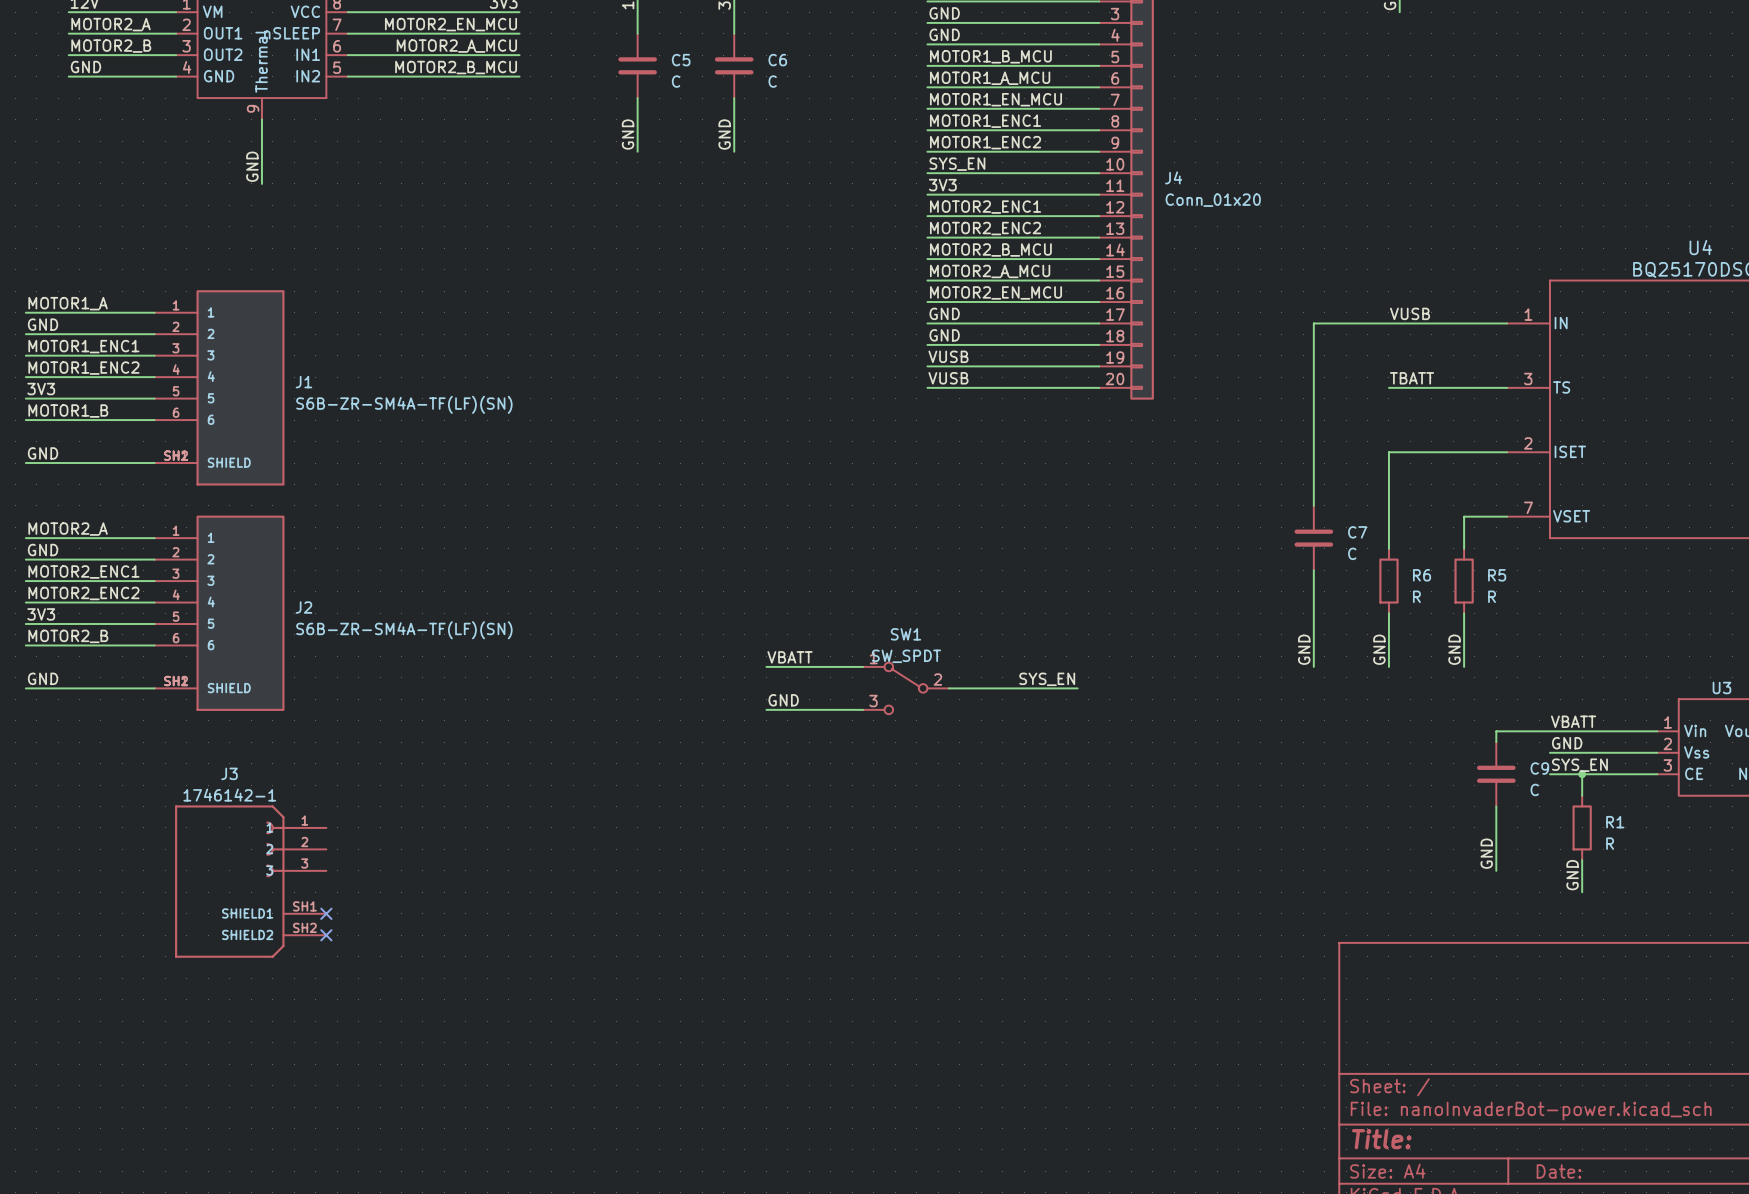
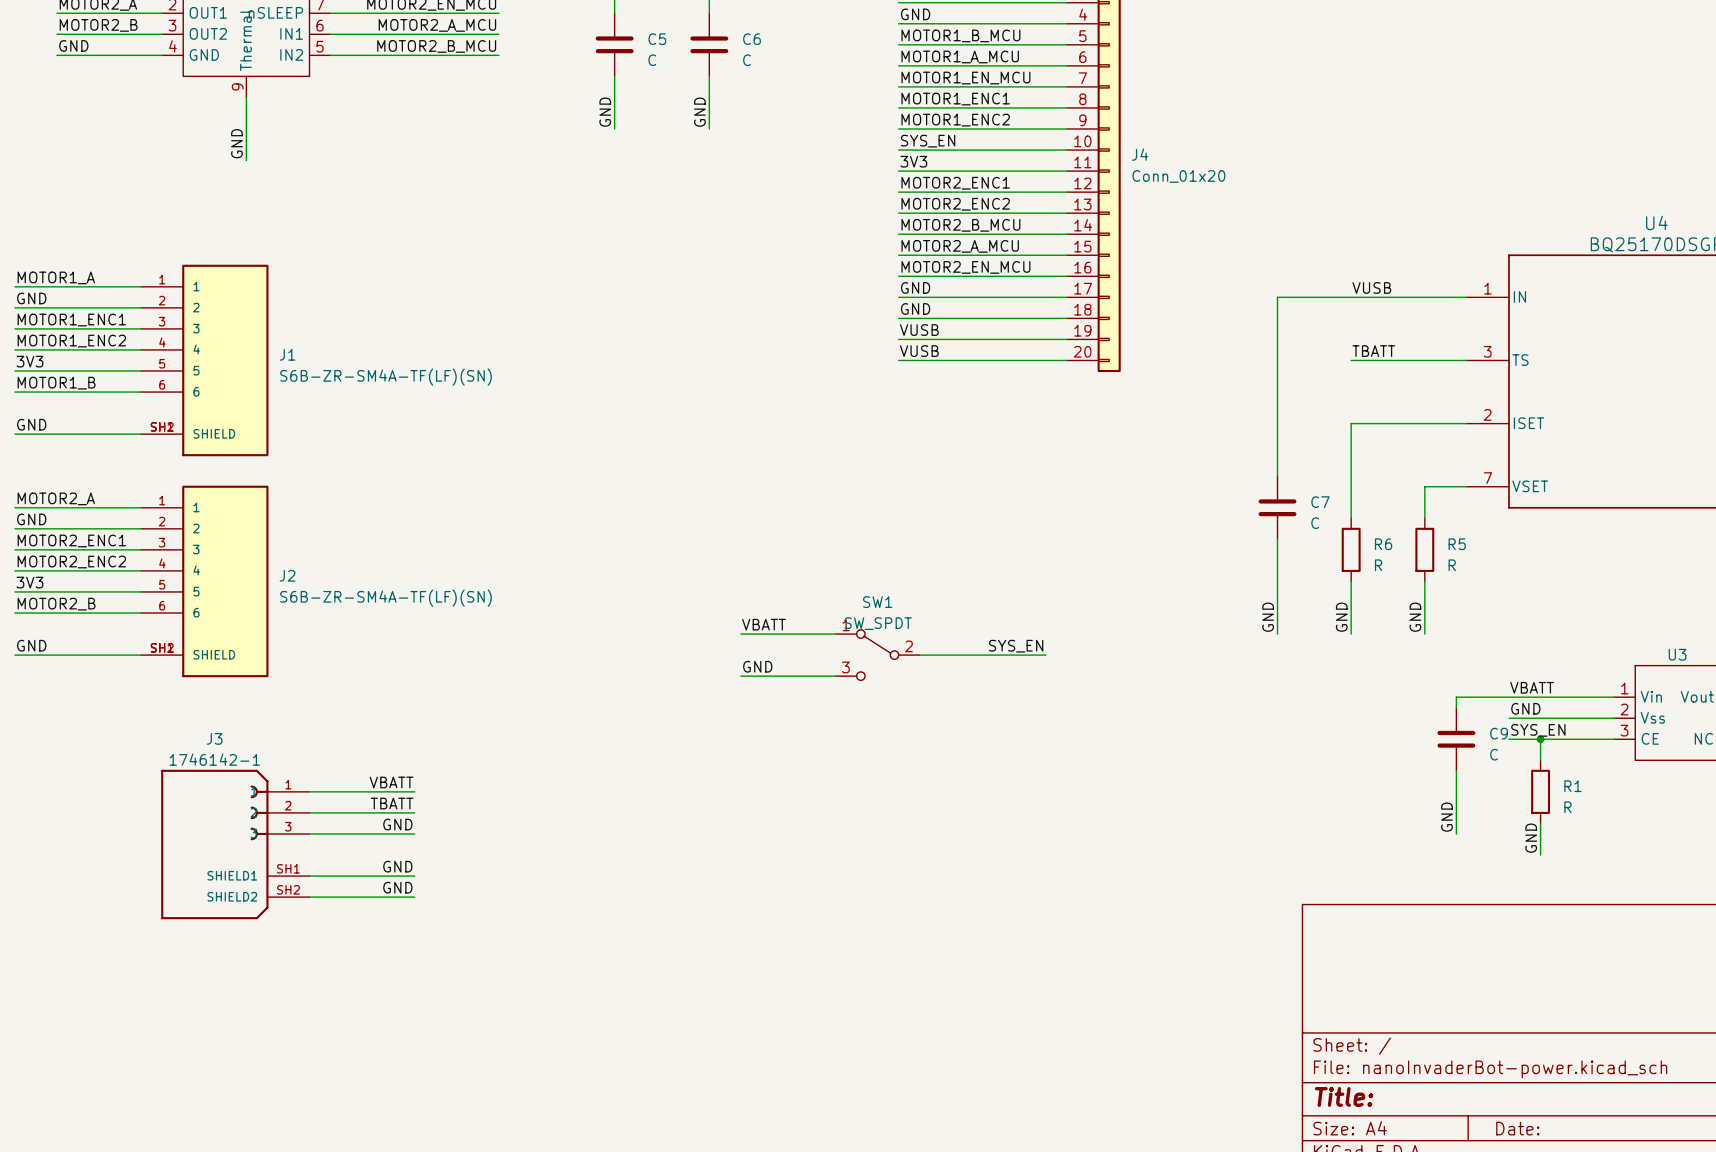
label: none -> VBATT (391, 782)
wire: none -> (309, 791) (414, 791)
label: none -> TBATT (392, 803)
wire: none -> (309, 812) (414, 812)
label: none -> GND (397, 824)
wire: none -> (309, 833) (414, 833)
label: none -> GND (397, 866)
wire: none -> (309, 876) (414, 876)
no-connect mark: (326, 913) -> none
label: none -> GND (397, 887)
wire: none -> (309, 897) (414, 897)
no-connect mark: (326, 935) -> none

